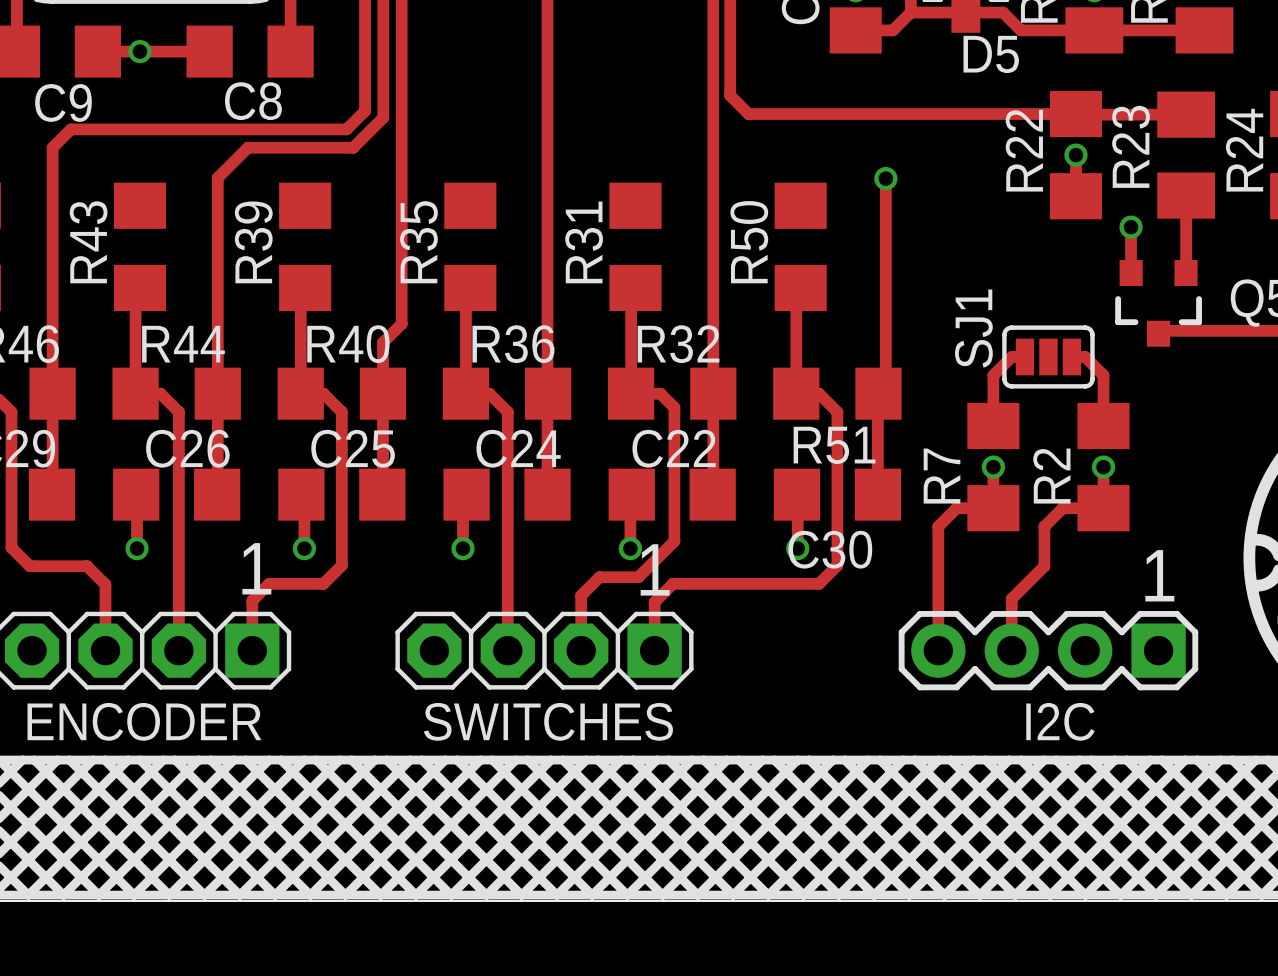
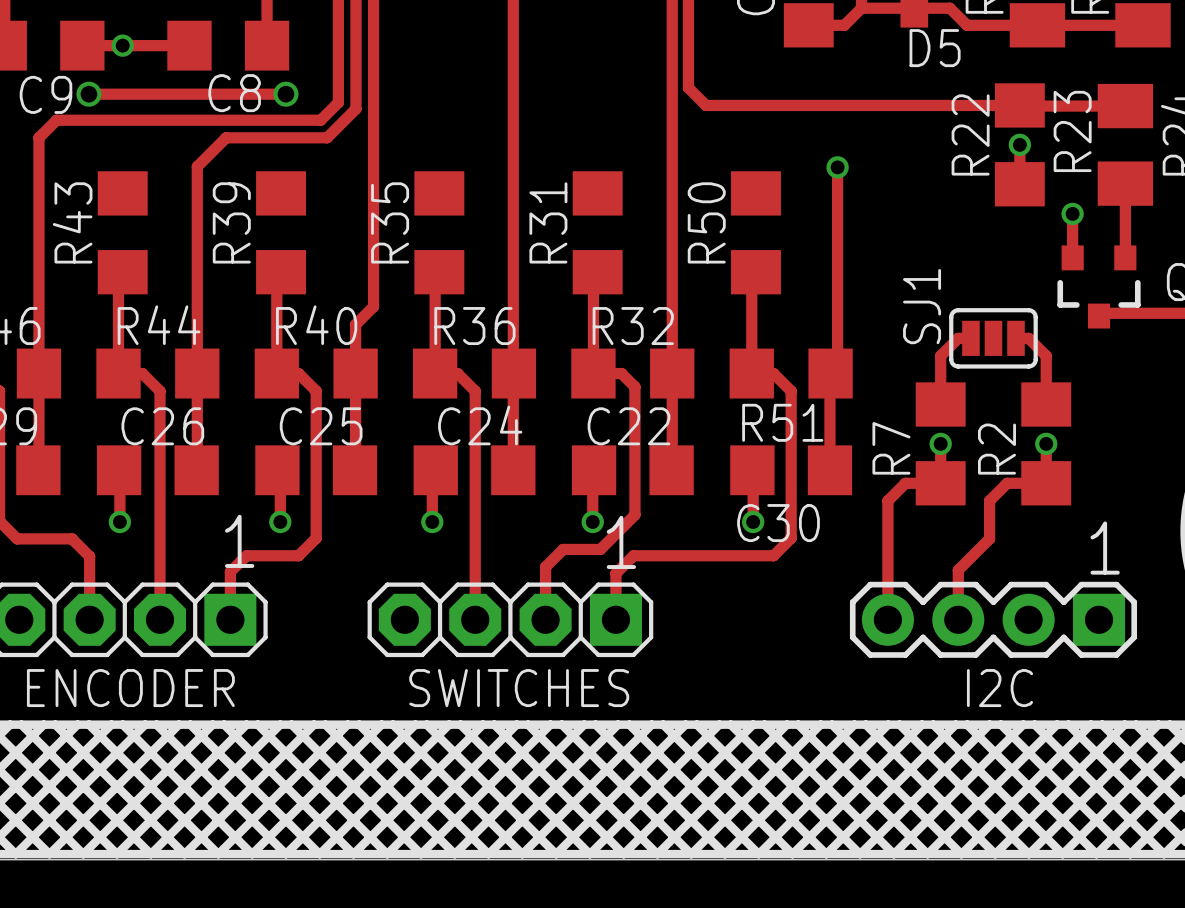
track: none -> (88, 94) (285, 94)
via: none -> (88, 94)
via: none -> (285, 94)

